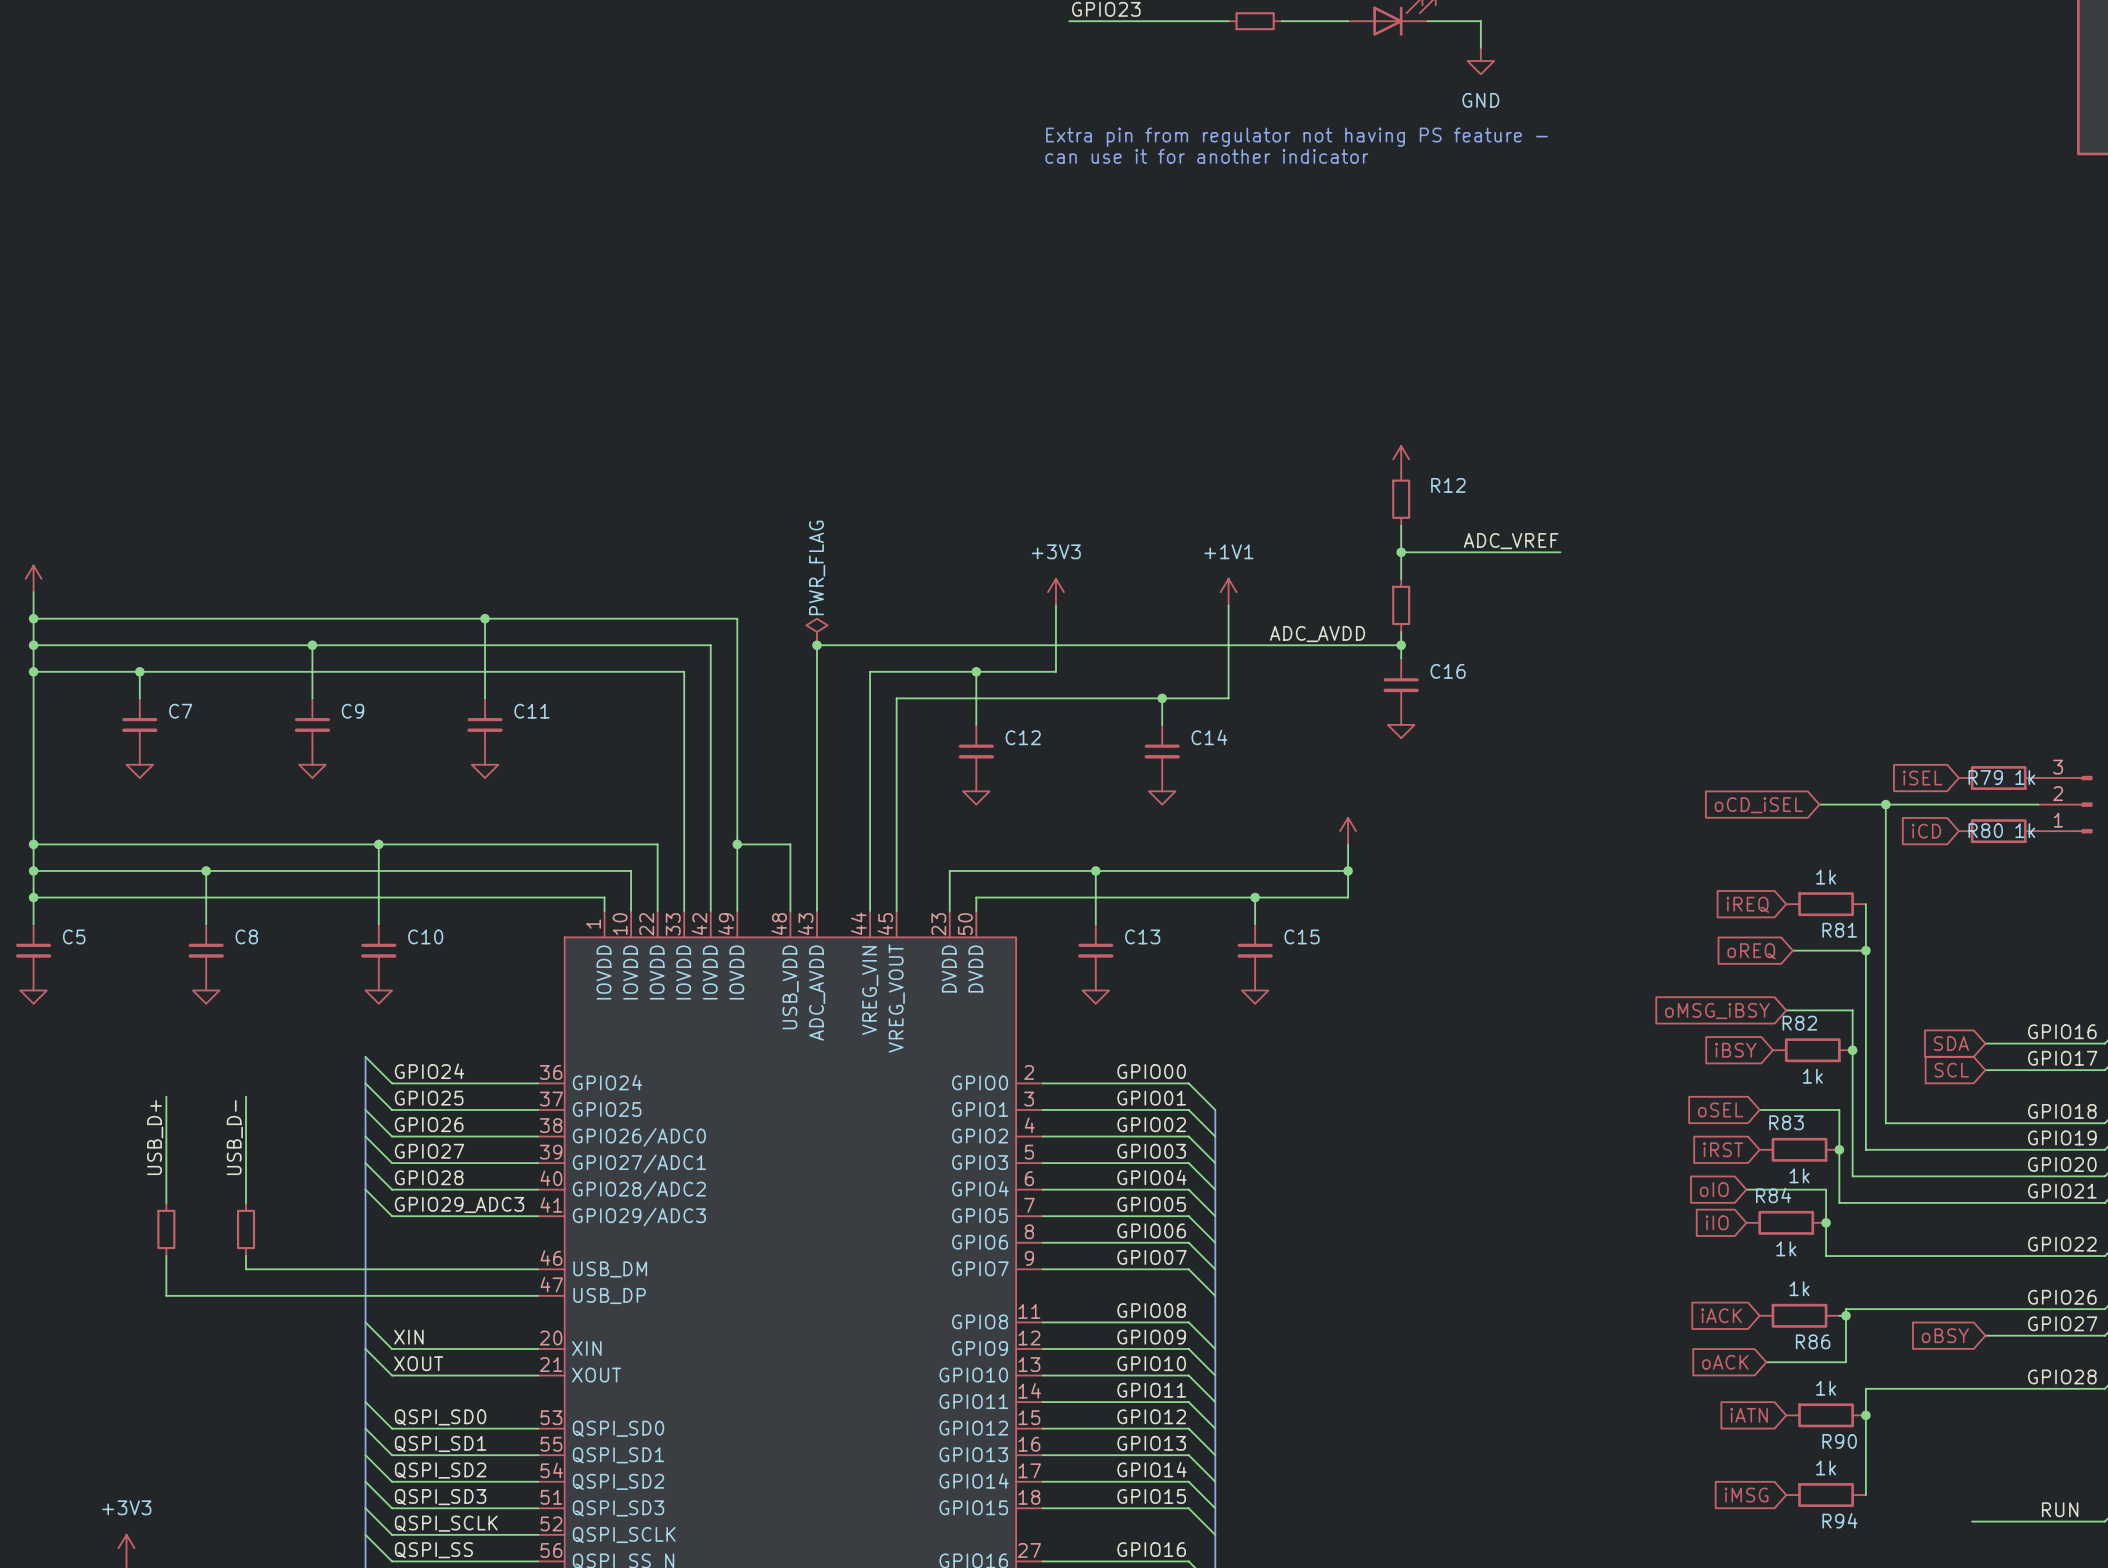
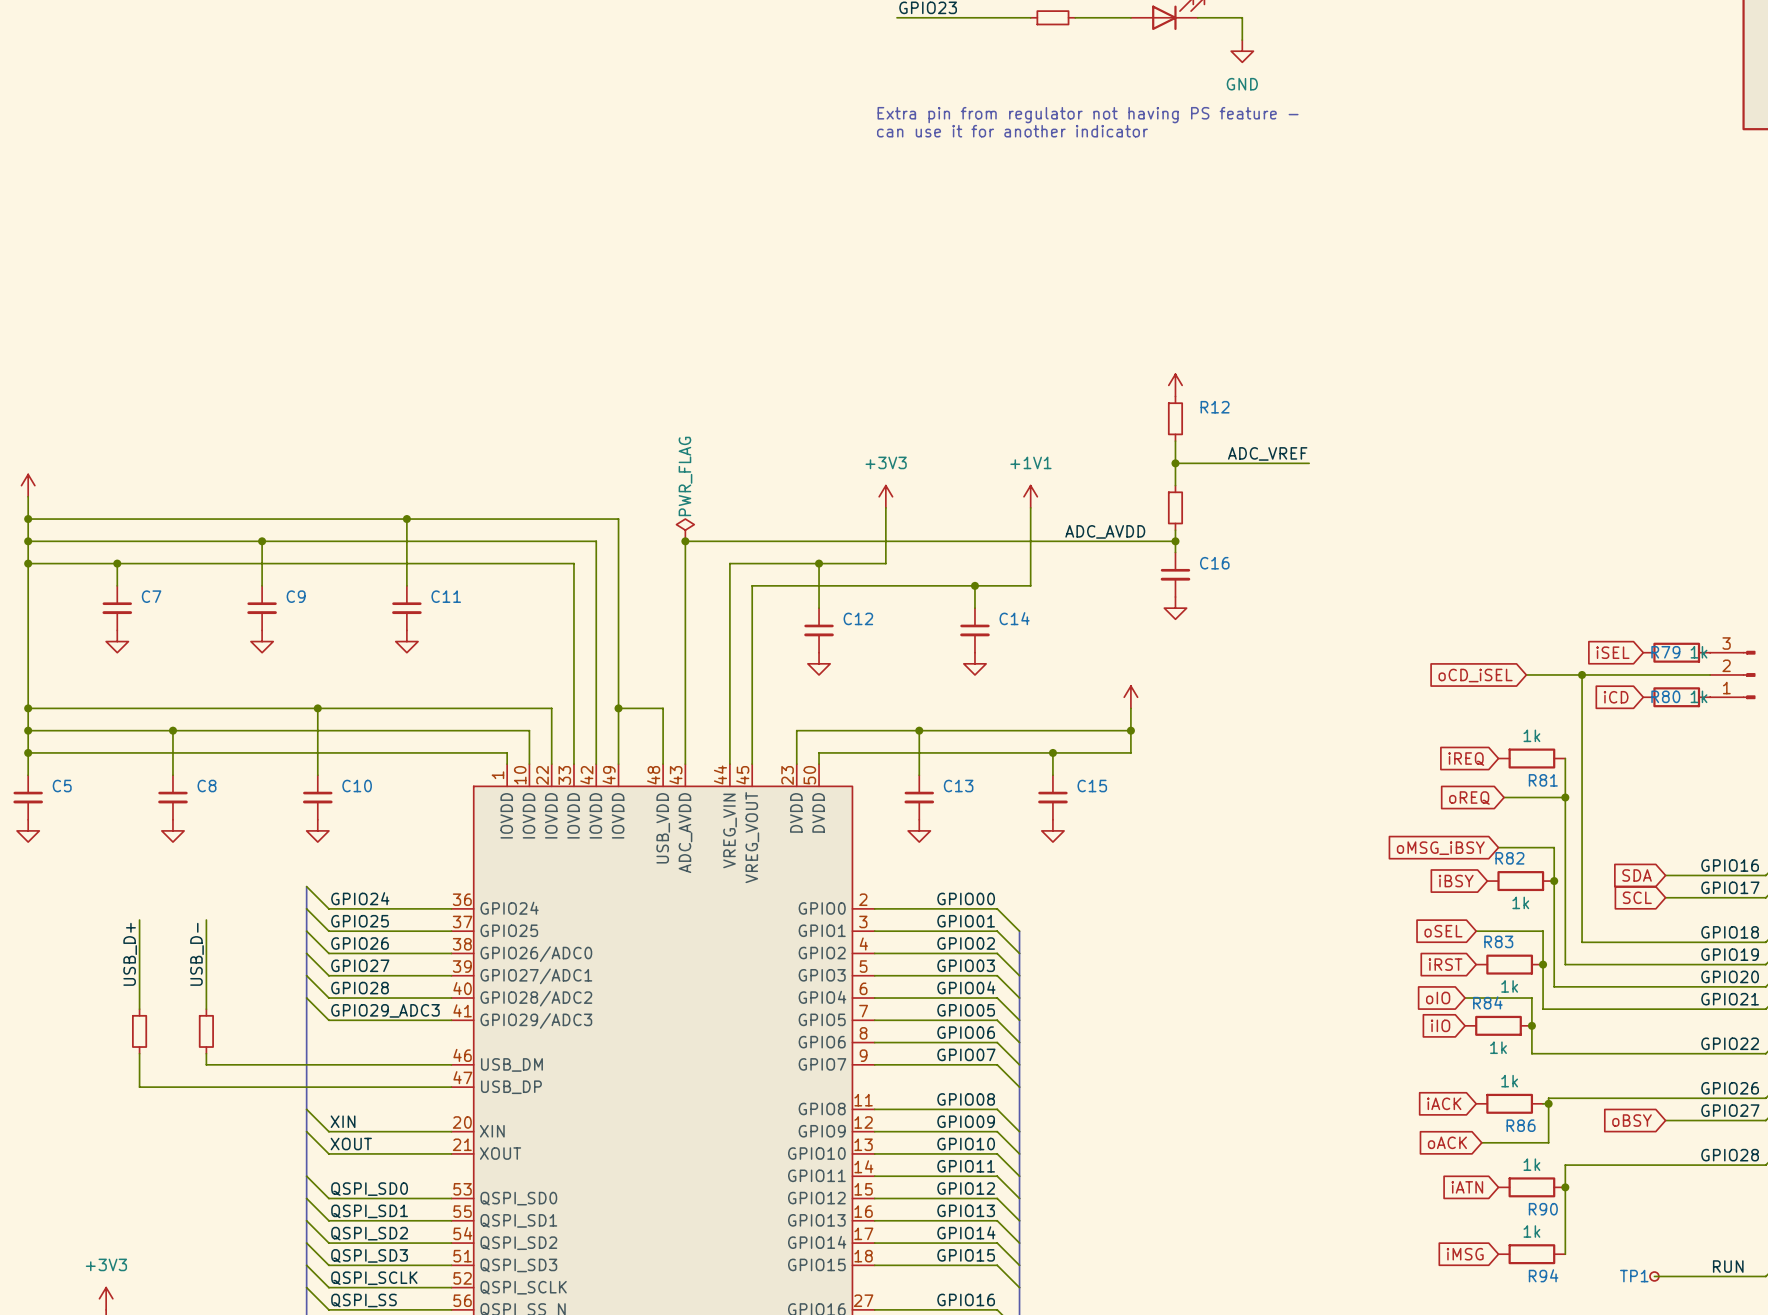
TP1: none -> (1654, 1276)

